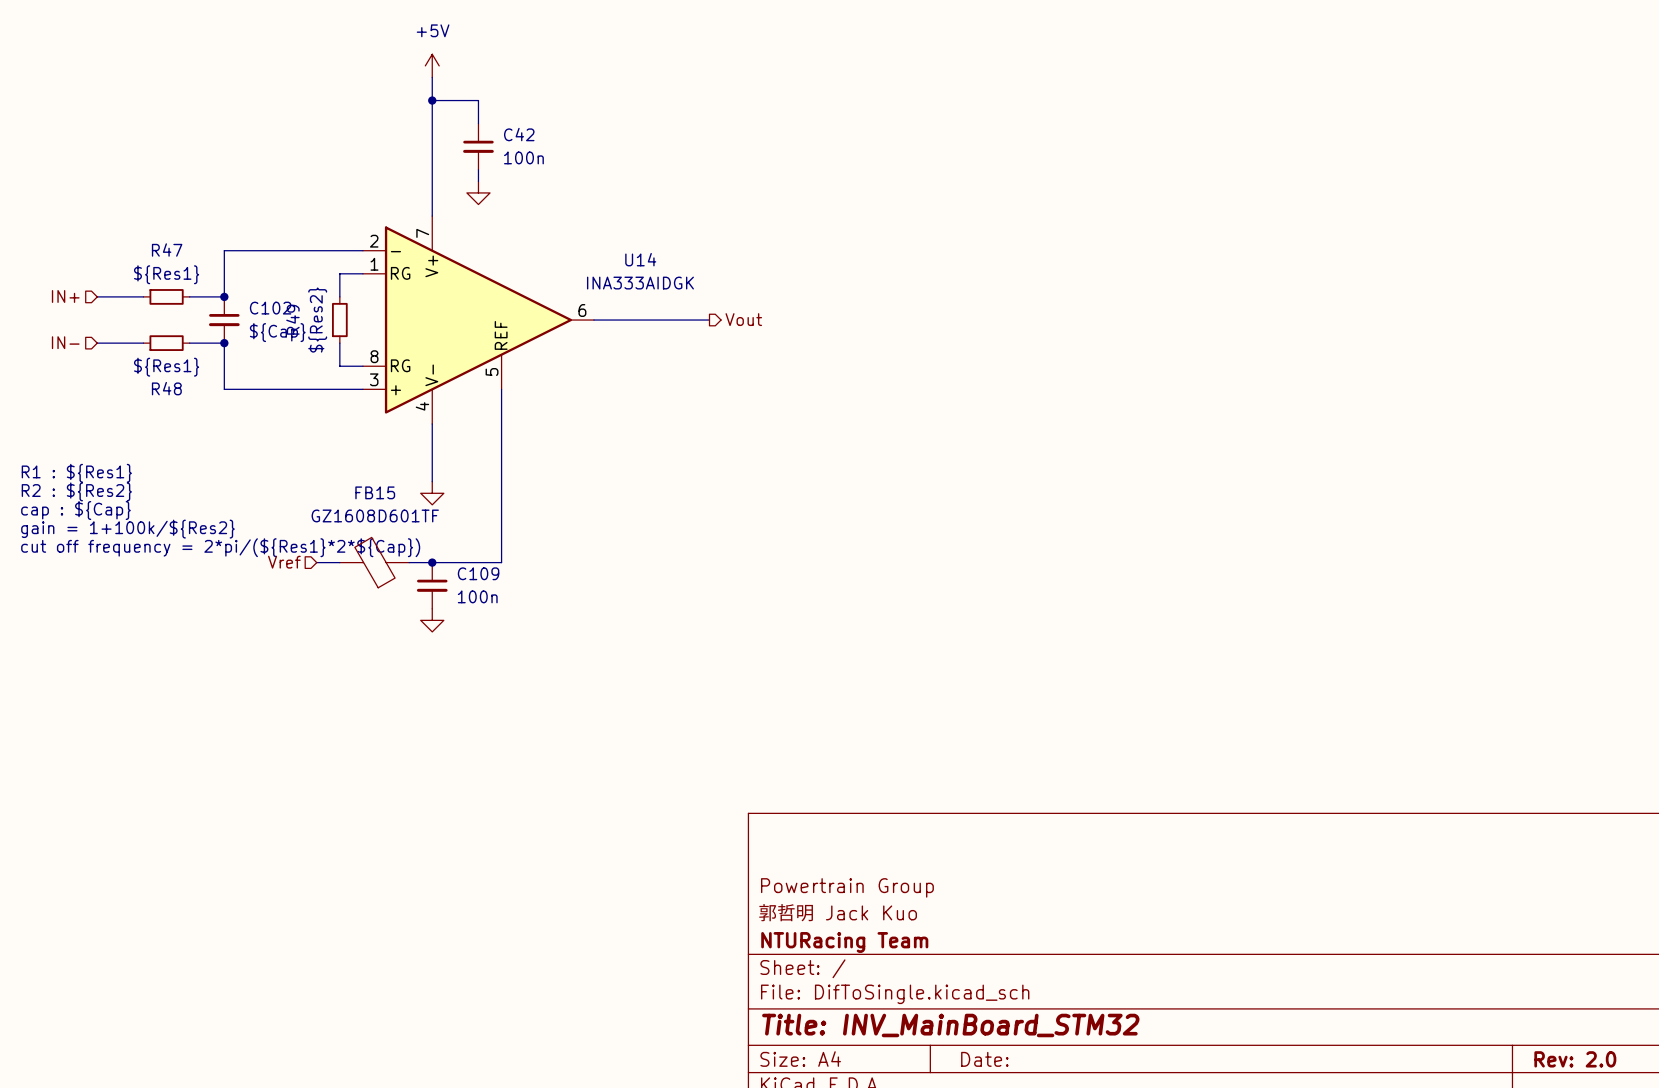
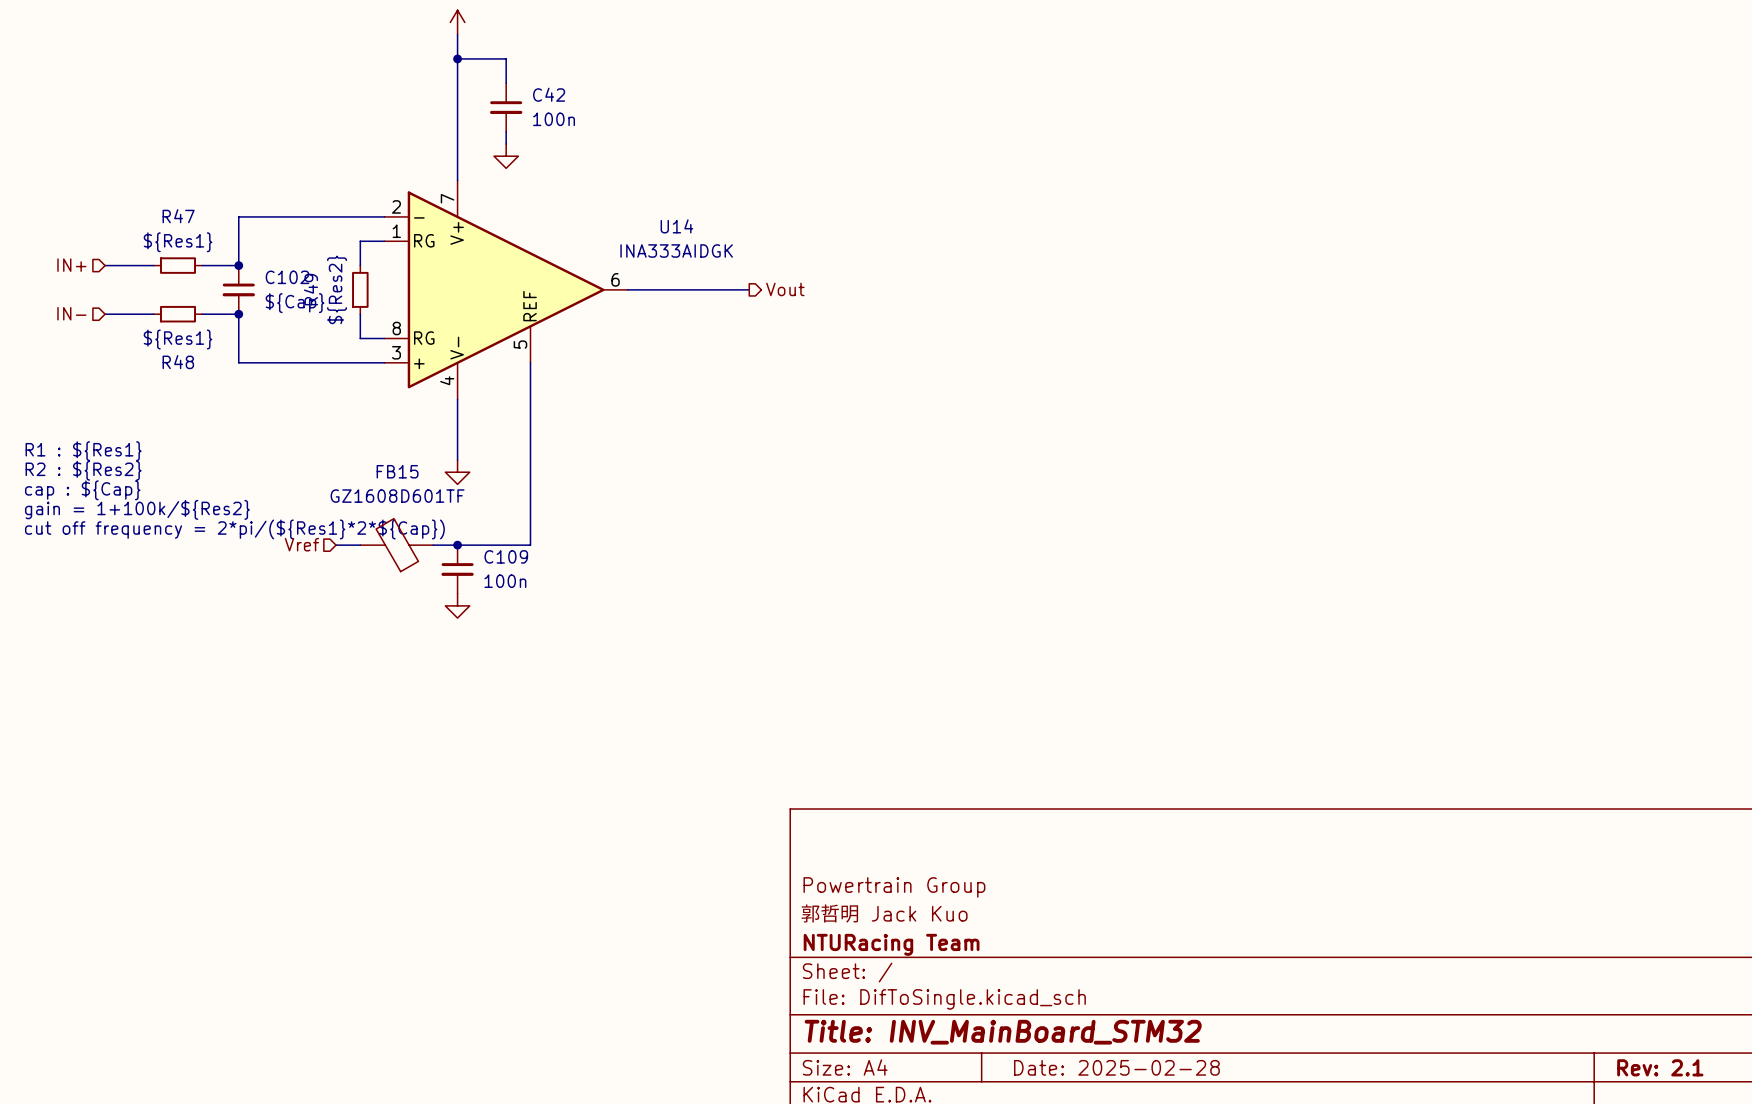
title block: Date: (984, 1059) -> Date: 2025-02-28 (1116, 1067)
title block: Rev: 2.0 (1575, 1059) -> Rev: 2.1 (1660, 1067)

